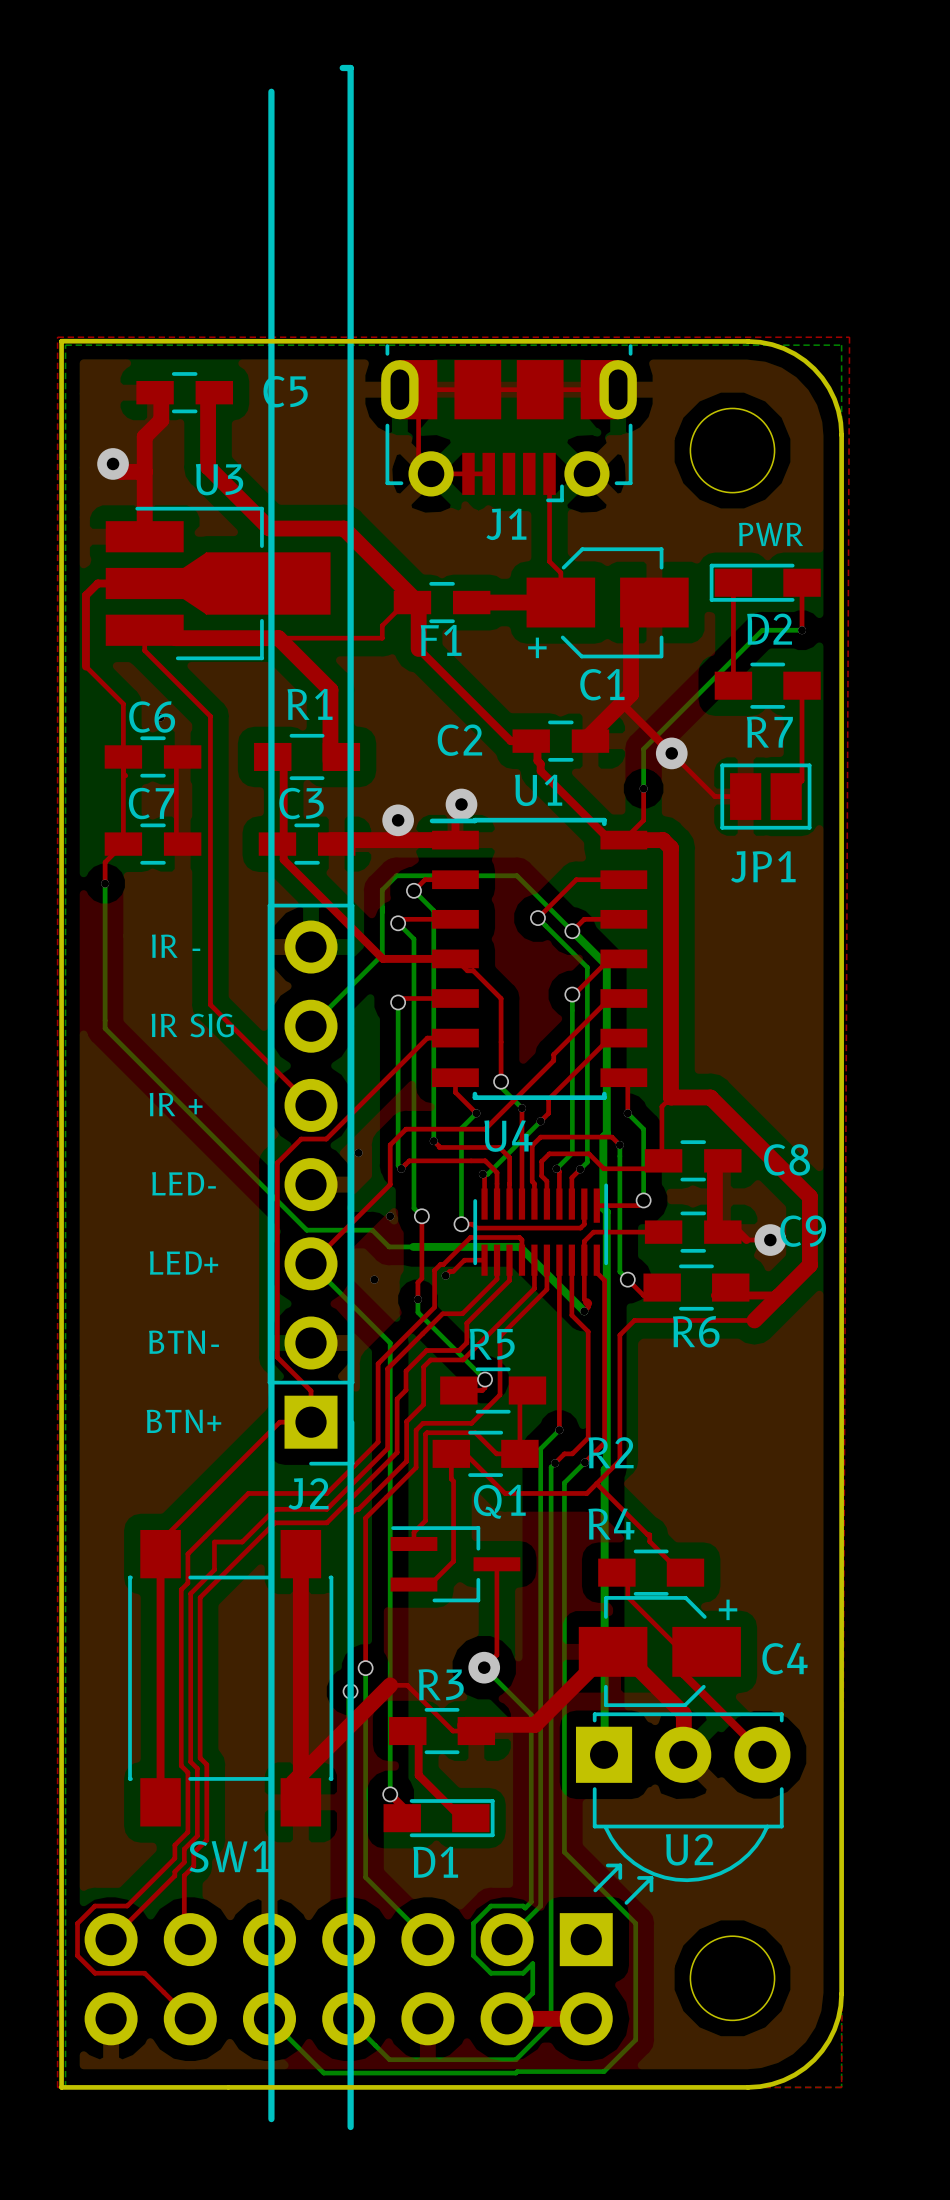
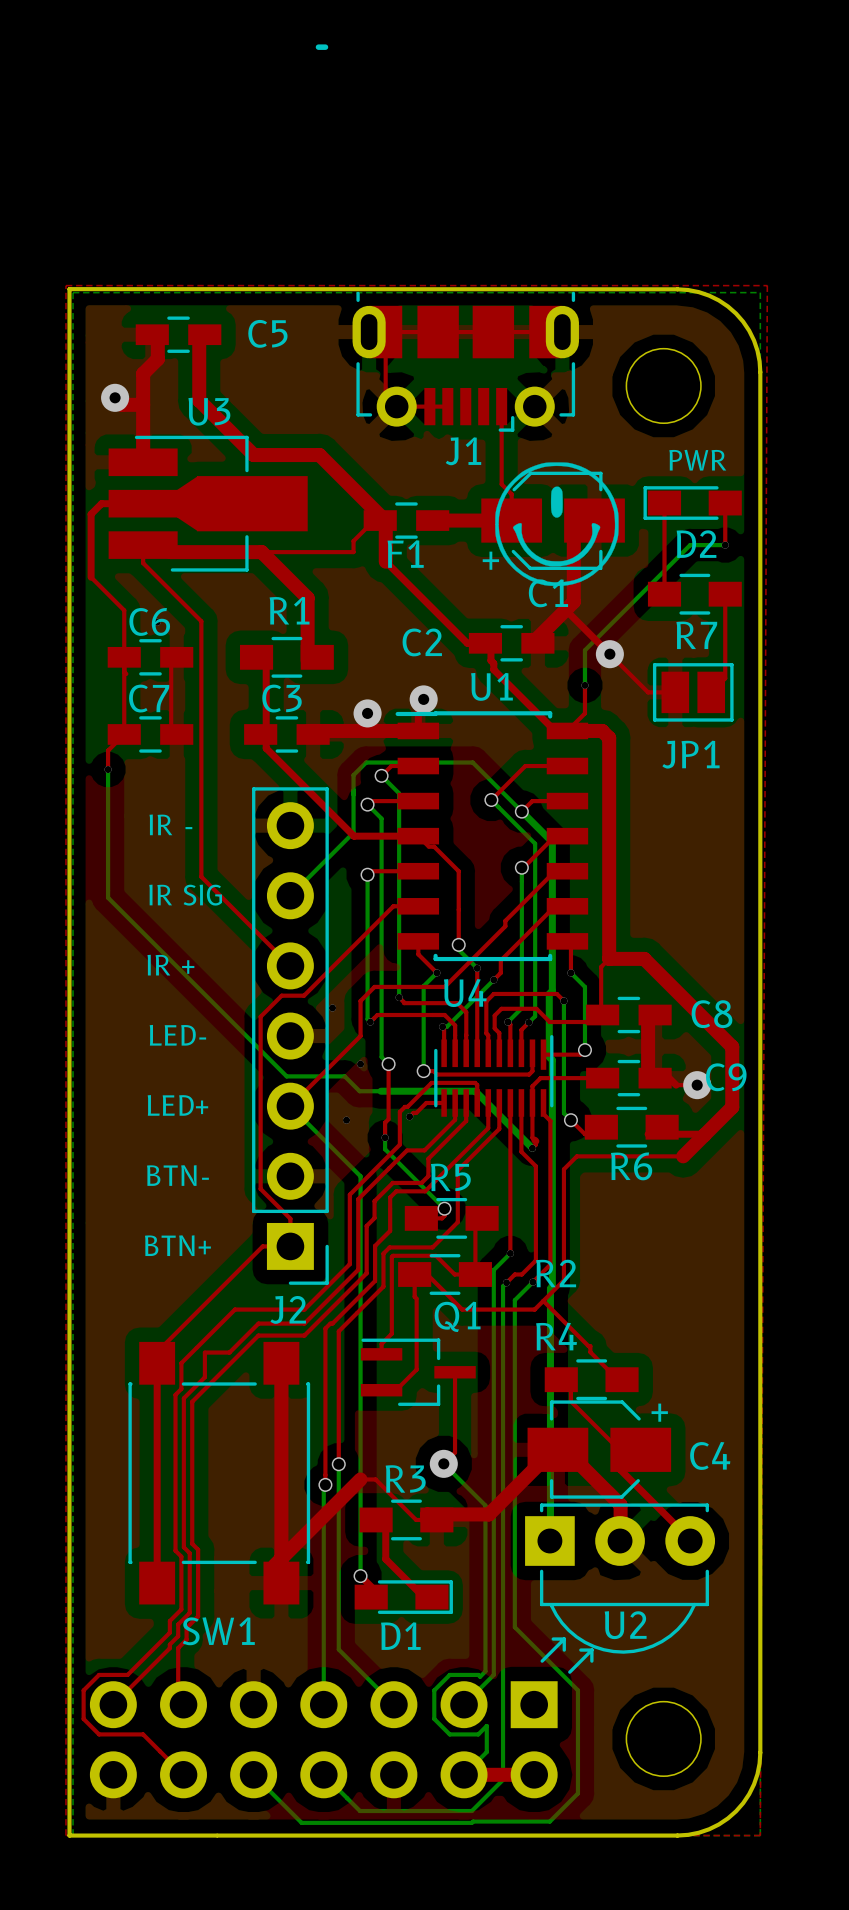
line: (350, 67) (350, 2127) -> none
line: (271, 91) (271, 2119) -> none
drawing: none -> [495, 462, 619, 587]

